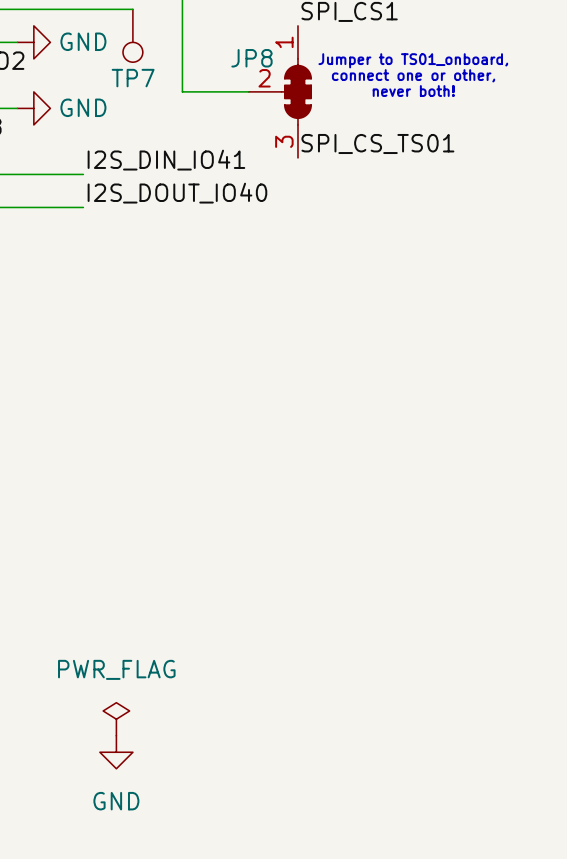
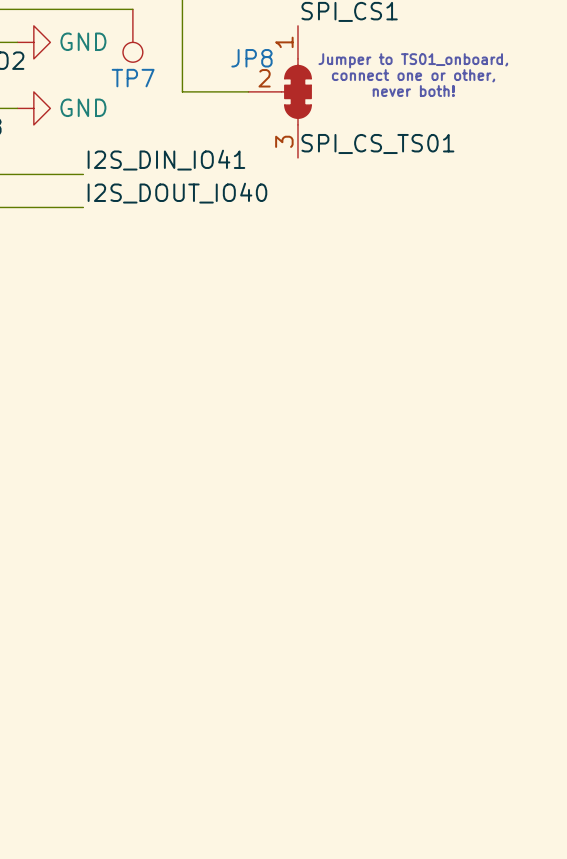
power symbol: PWR_FLAG (116, 719) -> none
power symbol: GND (116, 752) -> none

